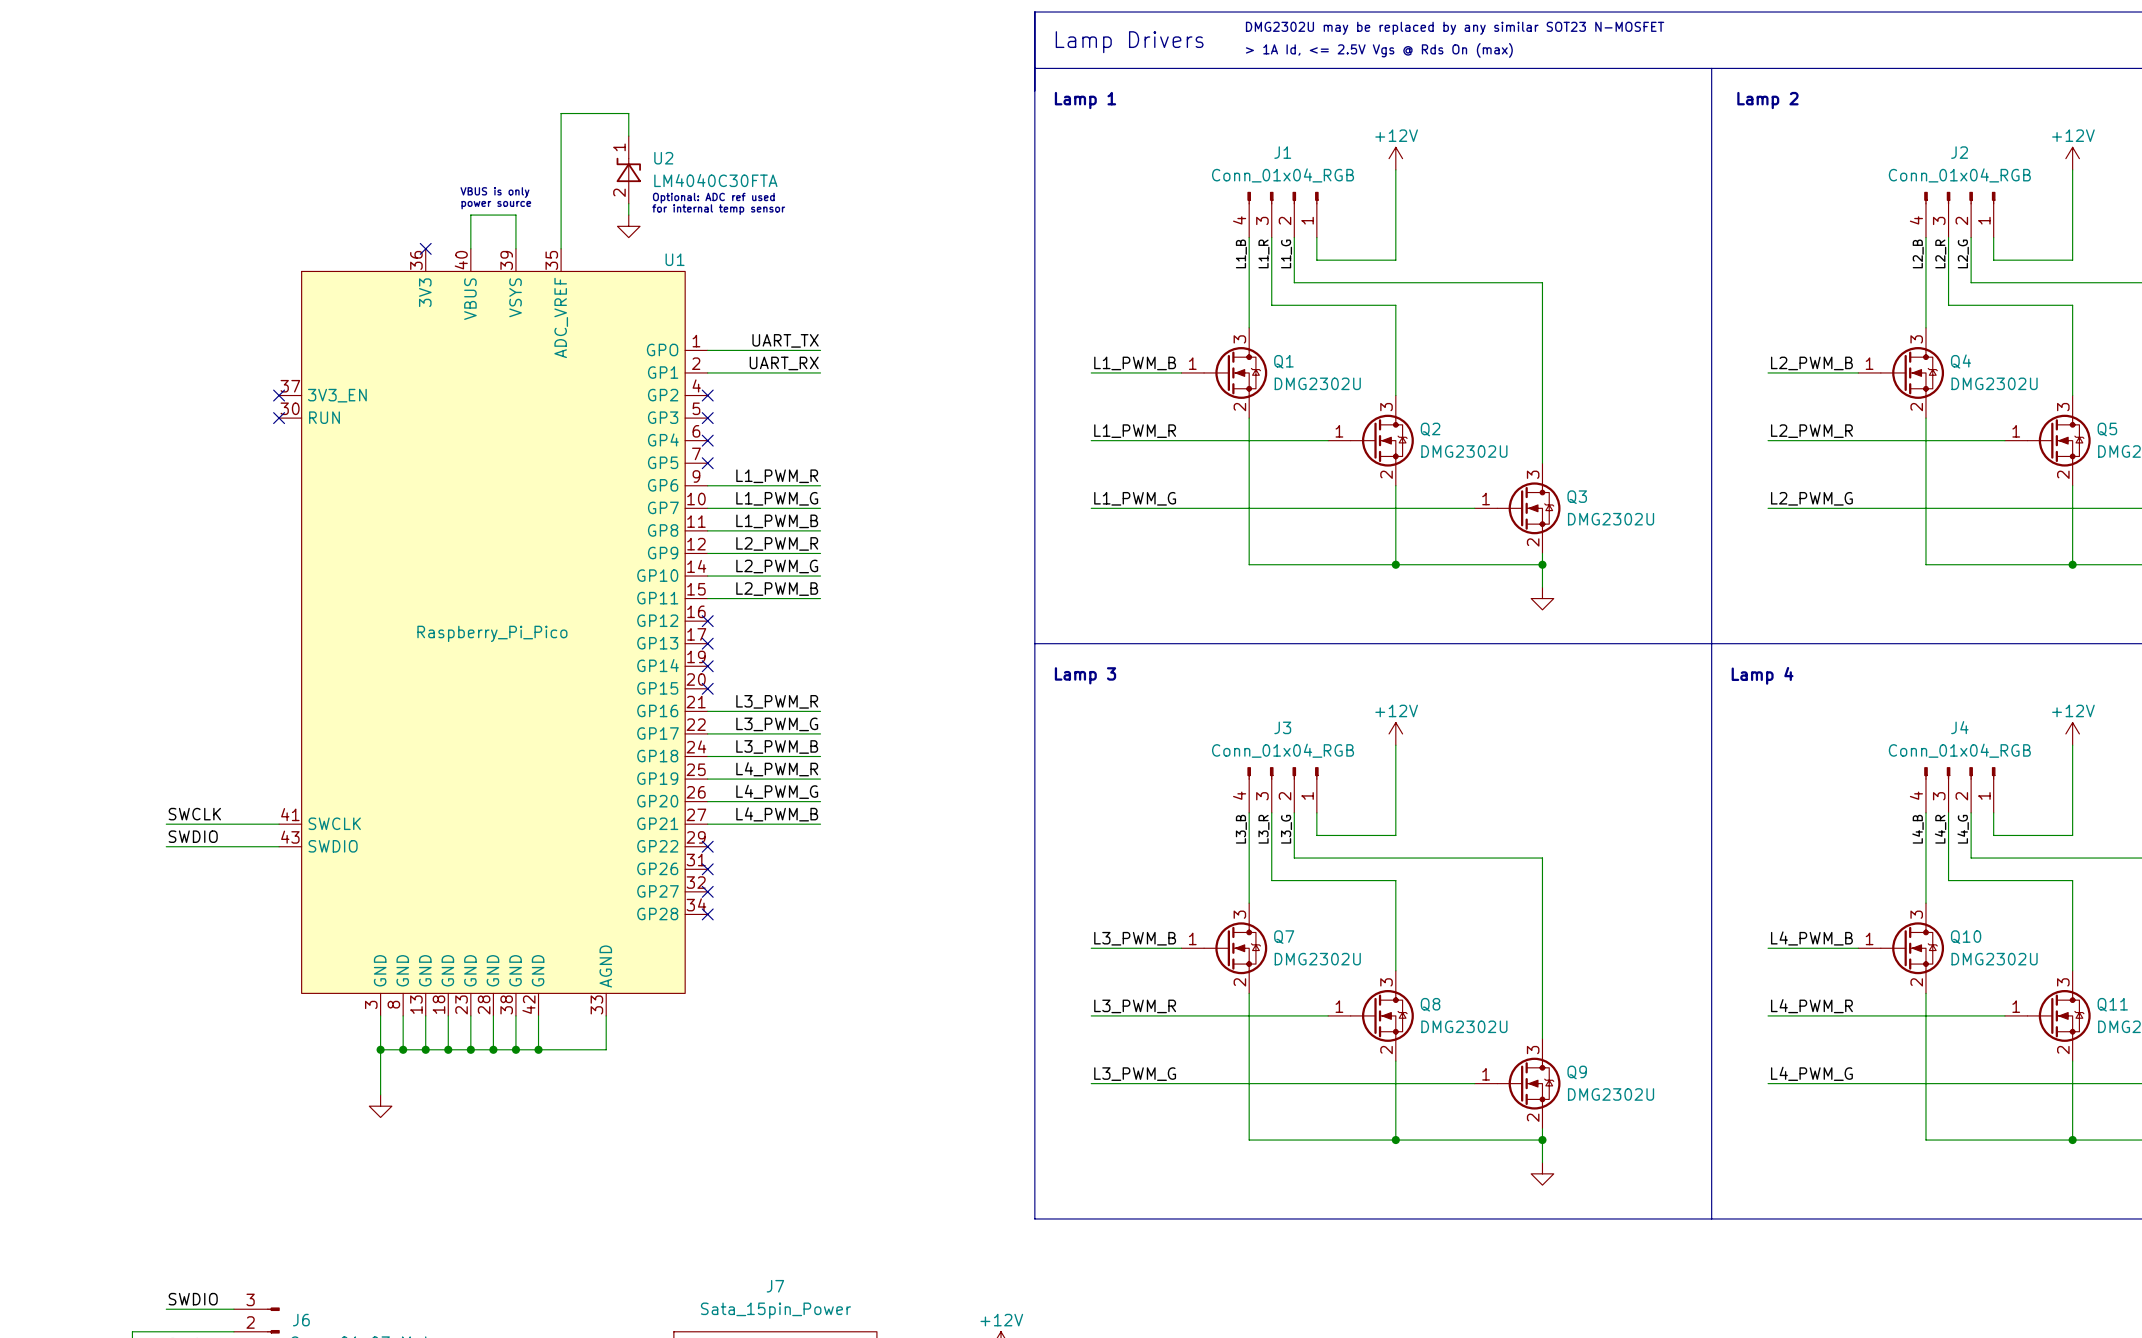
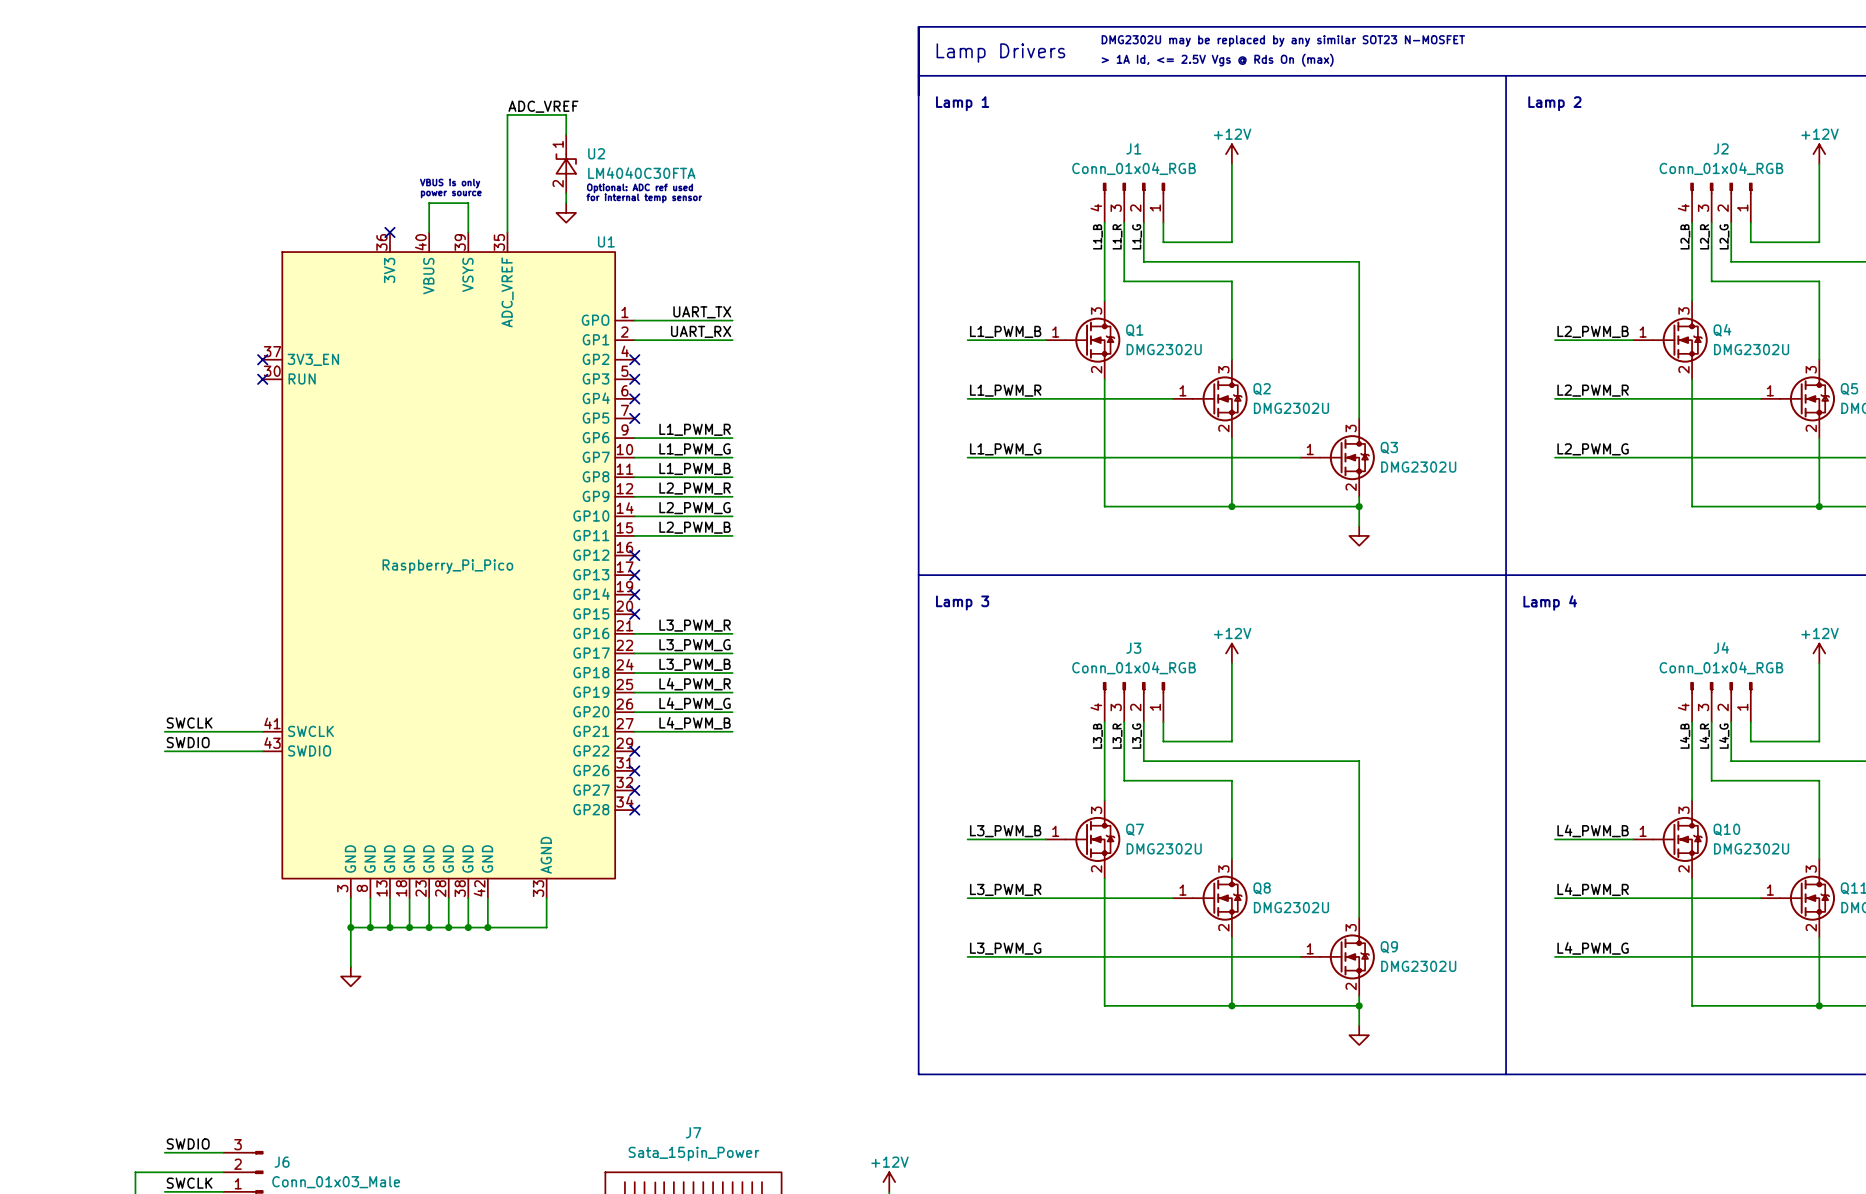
label: none -> ADC_VREF (543, 106)

